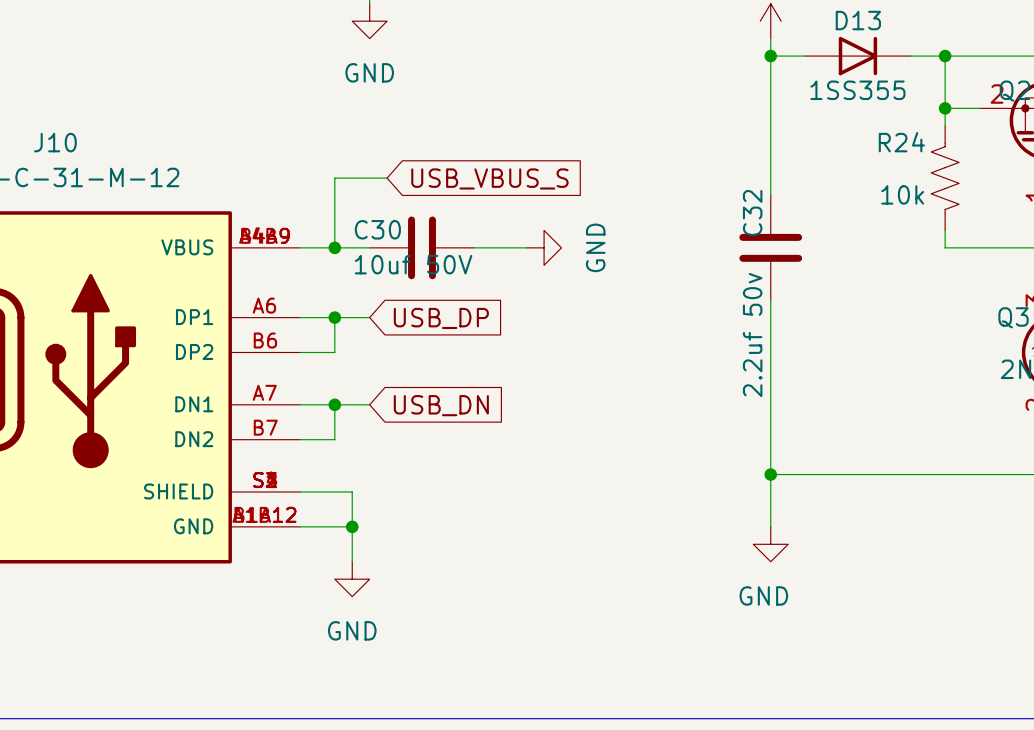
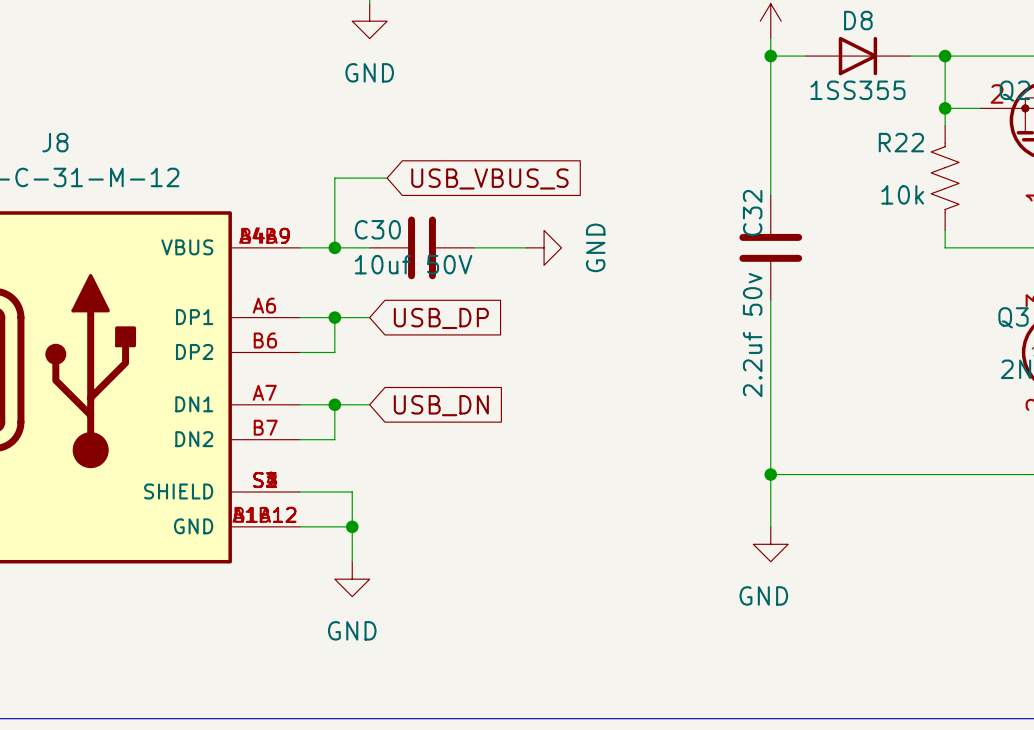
D13 name: D13 (858, 20) -> D8 (858, 20)
J10 name: J10 (55, 142) -> J8 (55, 142)
R24 name: R24 (901, 142) -> R22 (901, 142)

